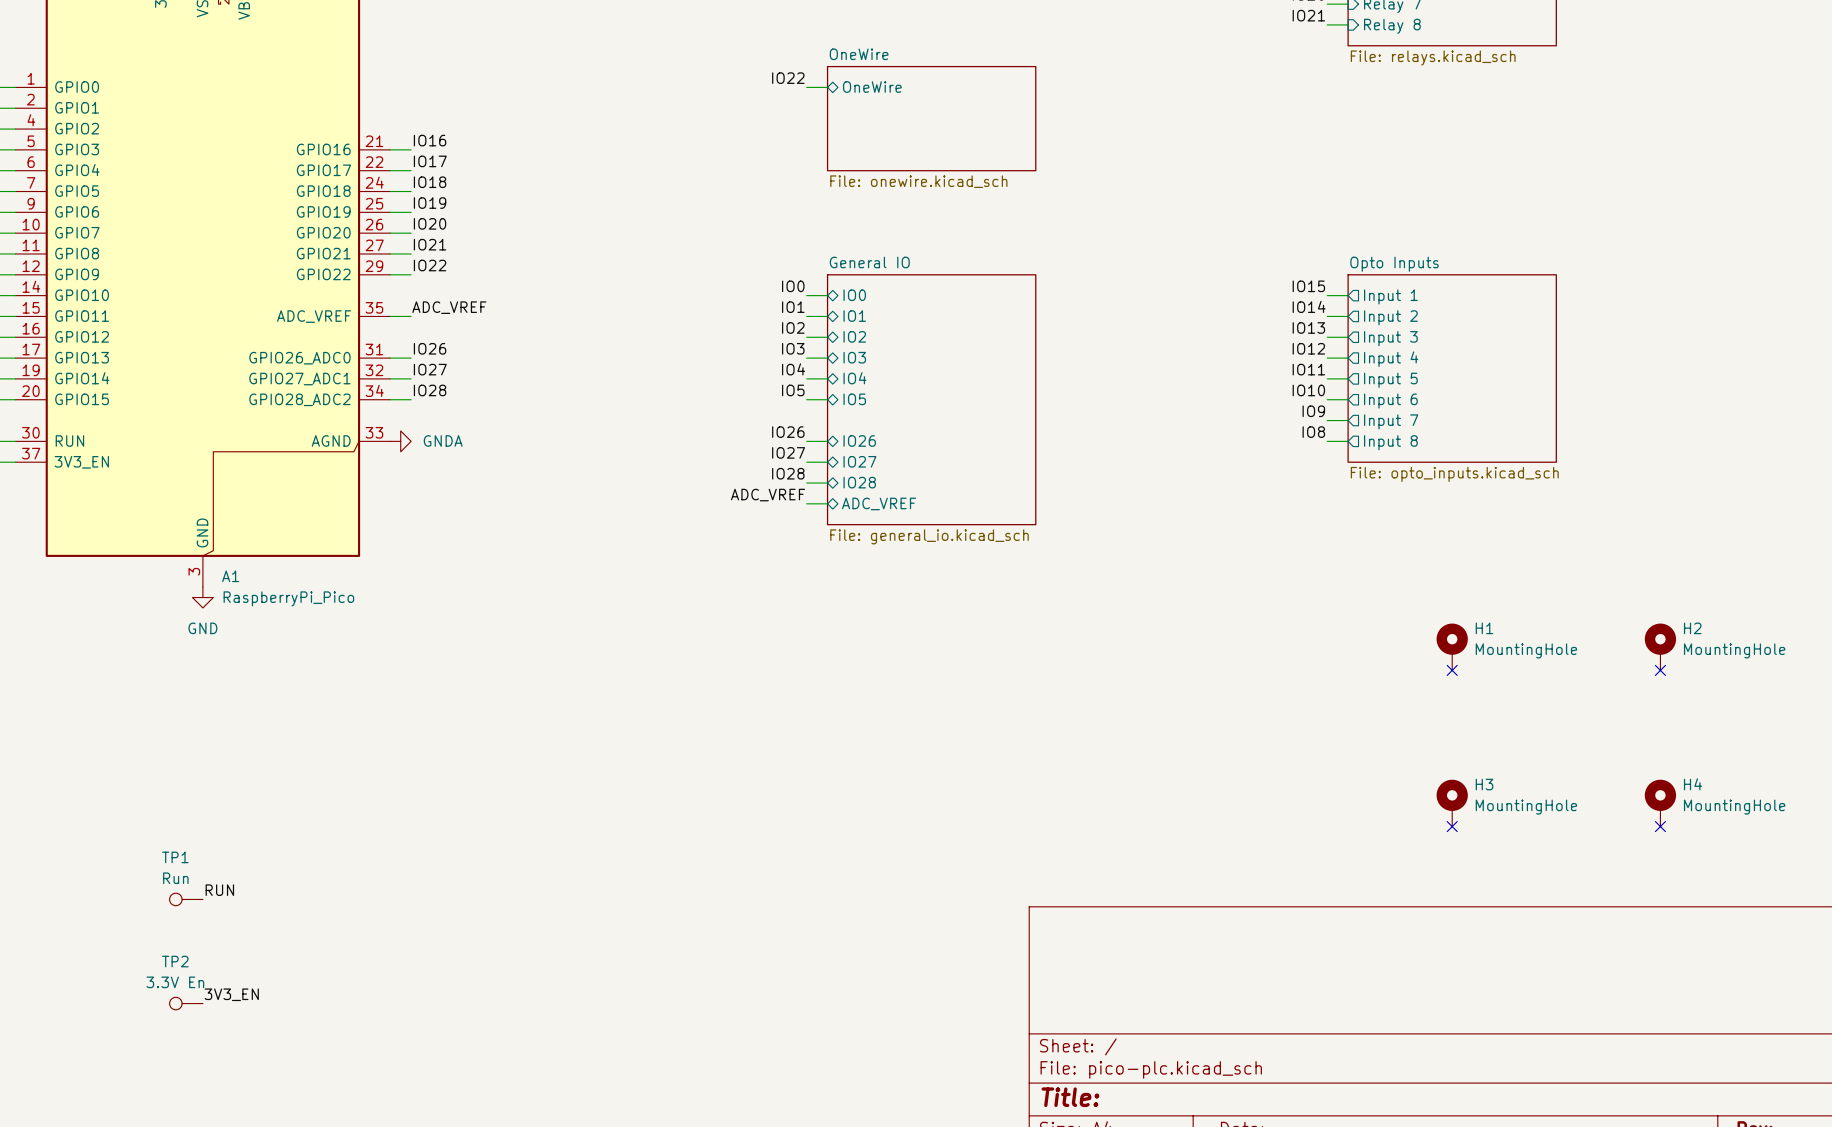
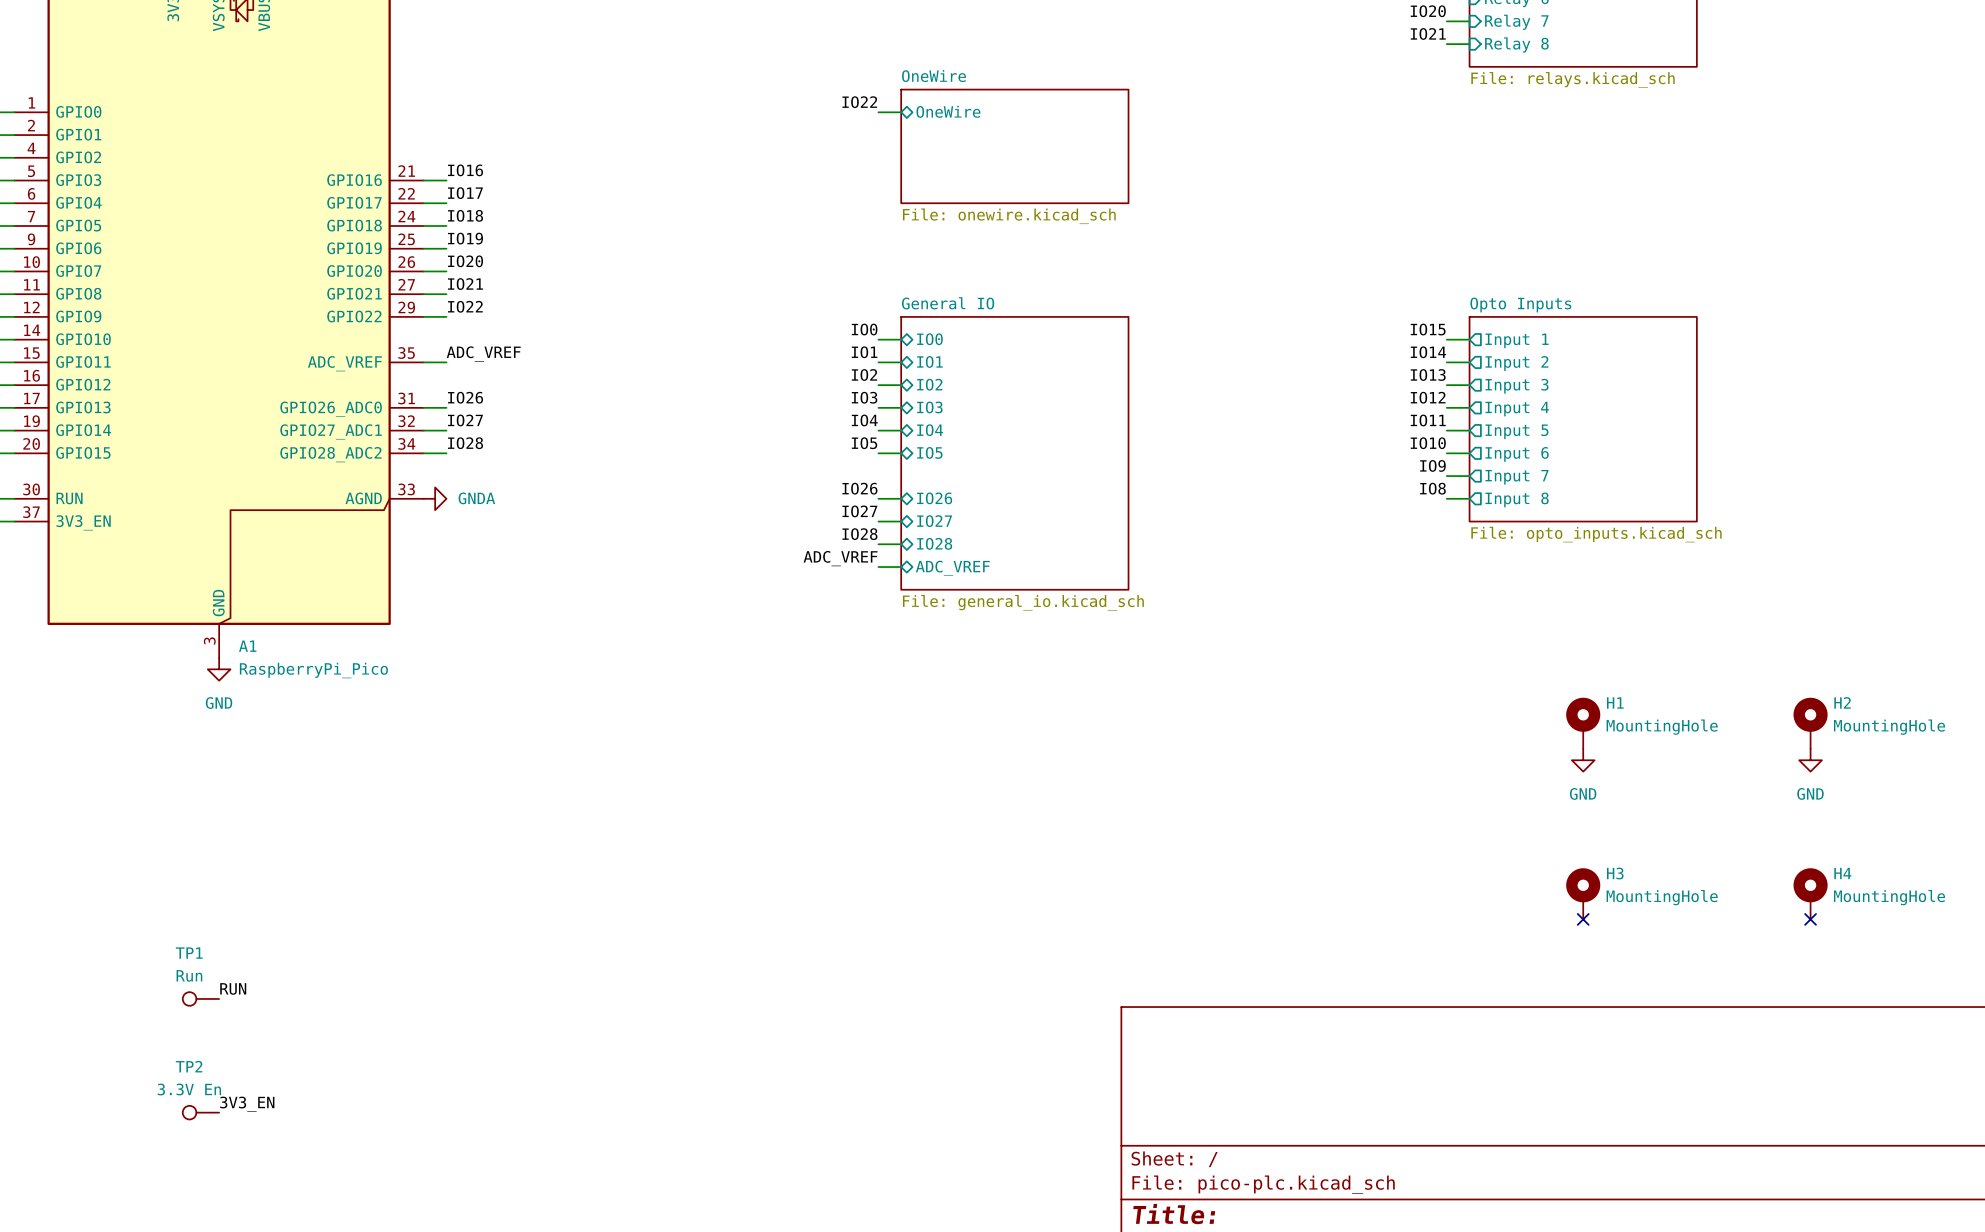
no-connect mark: (1452, 670) -> none
no-connect mark: (1660, 670) -> none
power symbol: none -> GND (1583, 760)
power symbol: none -> GND (1810, 760)

